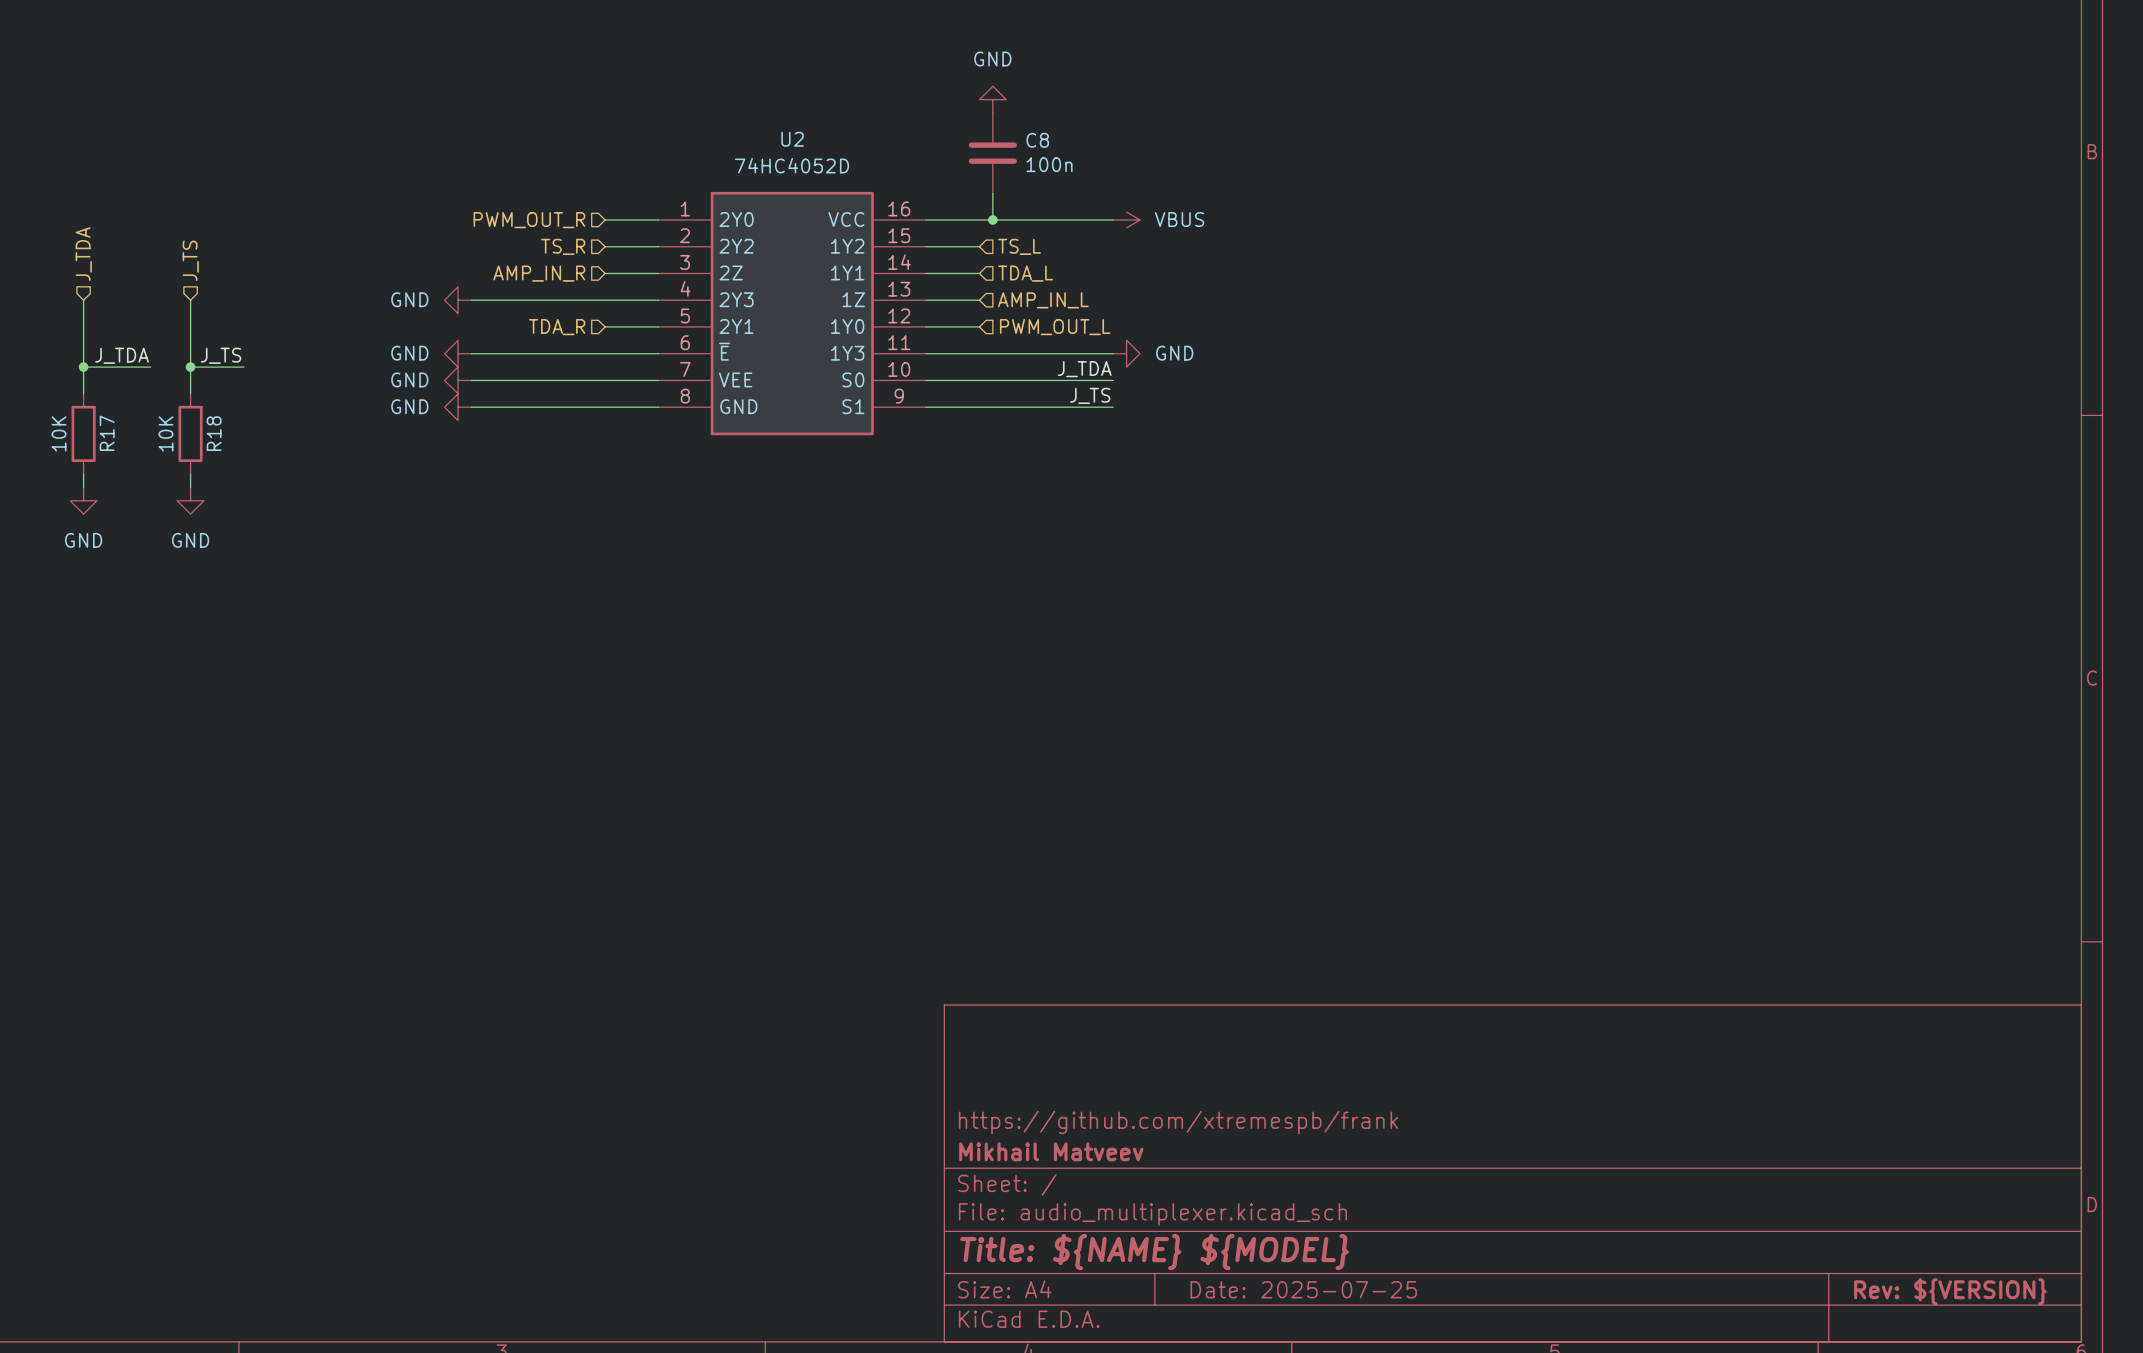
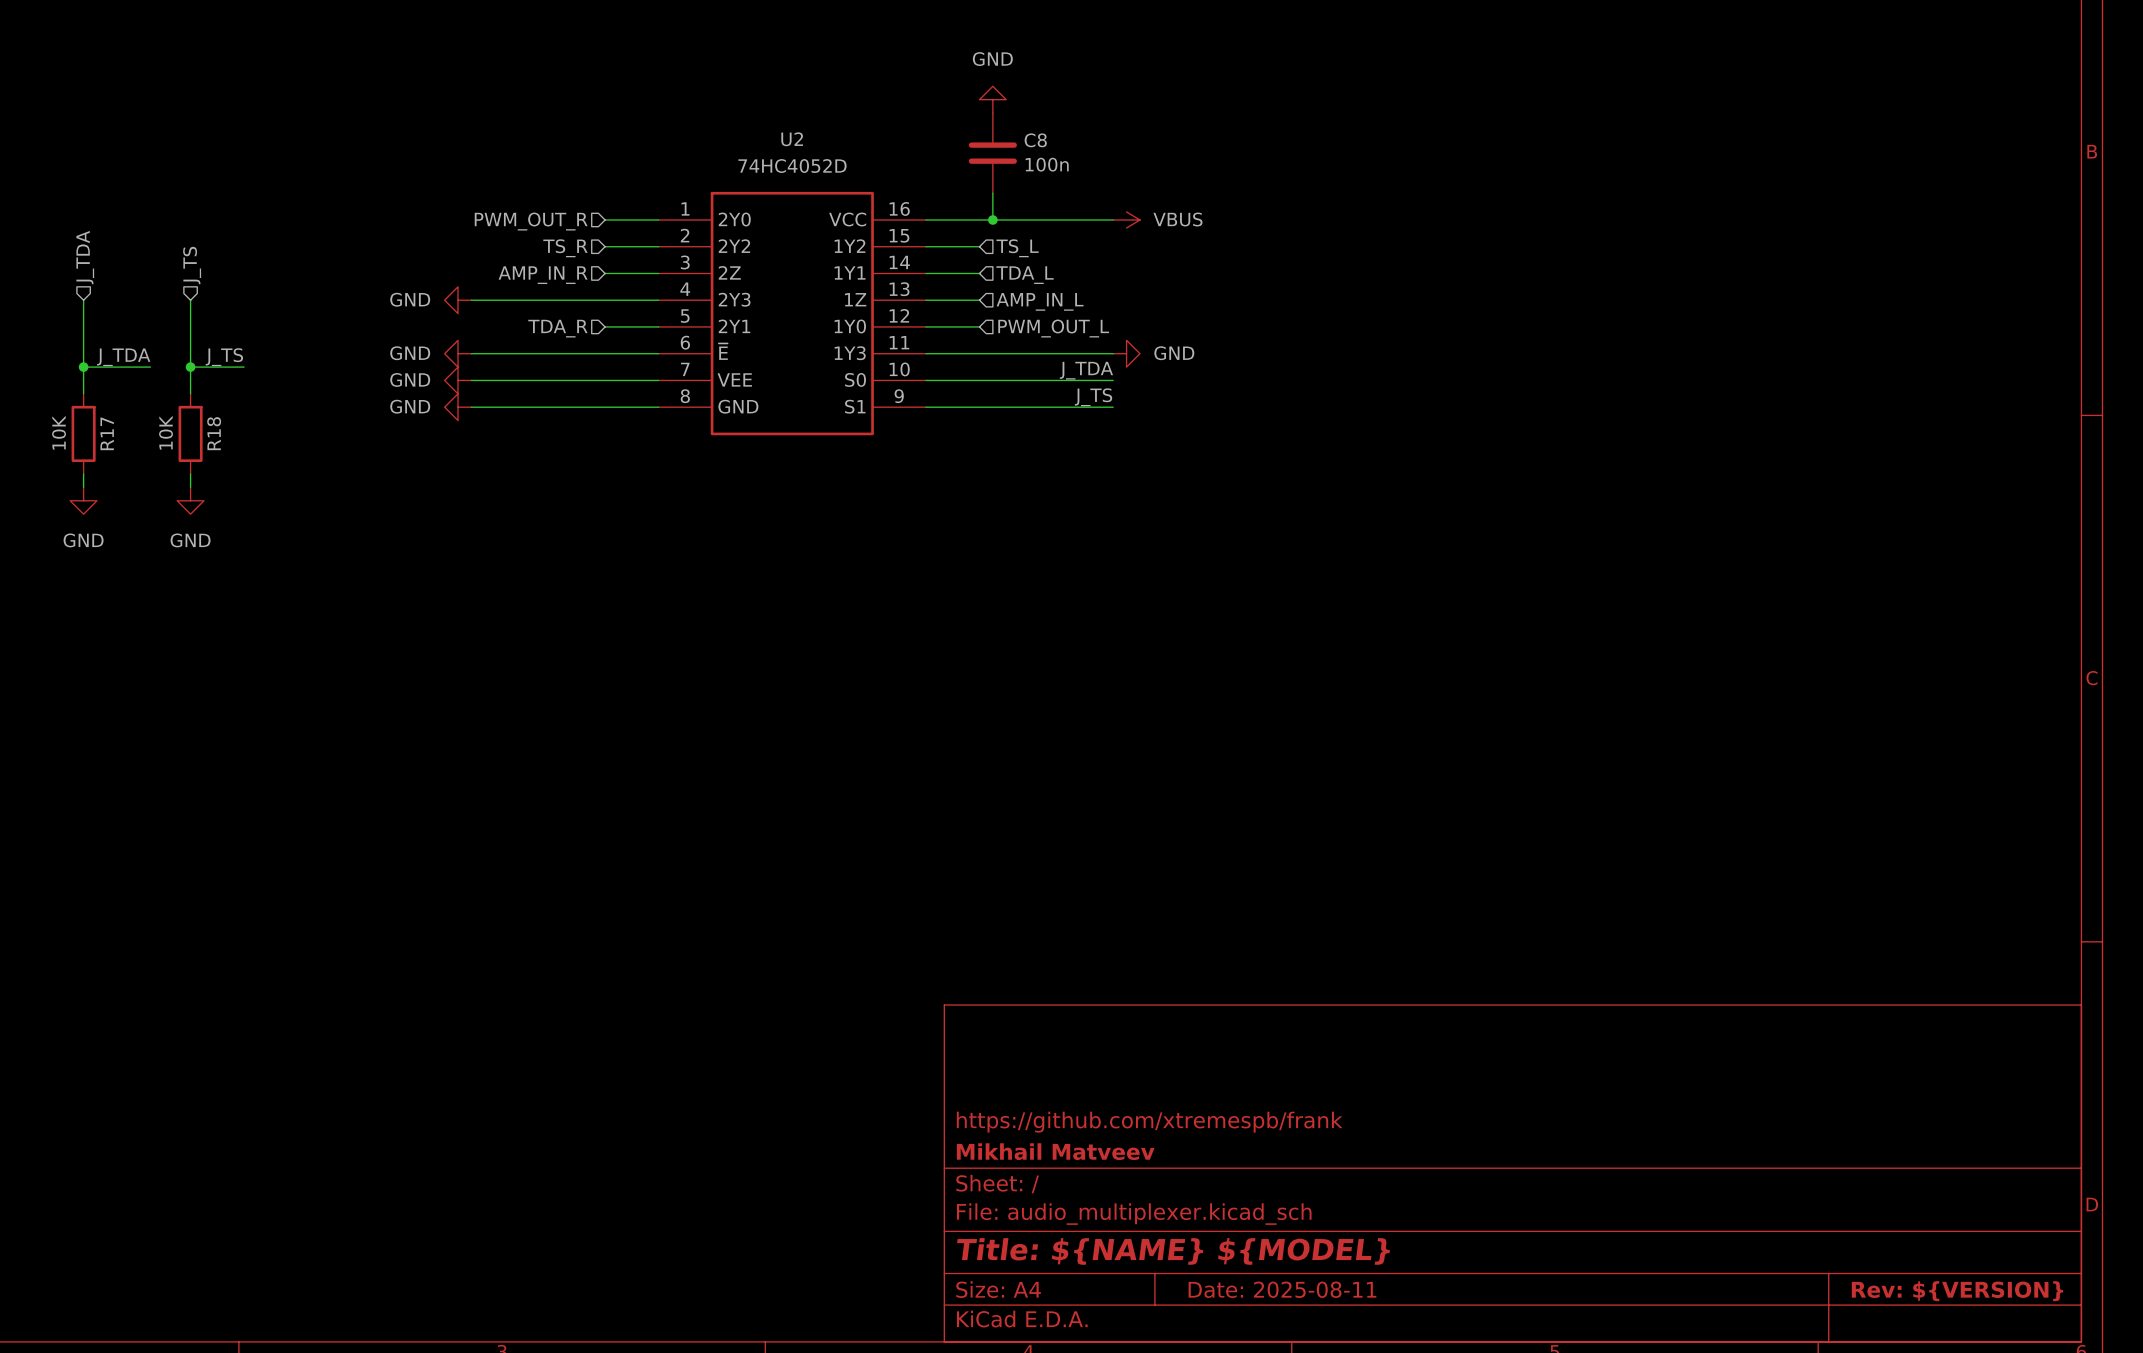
title block: Date: 2025-07-25 (1303, 1289) -> Date: 2025-08-11 (1282, 1289)

